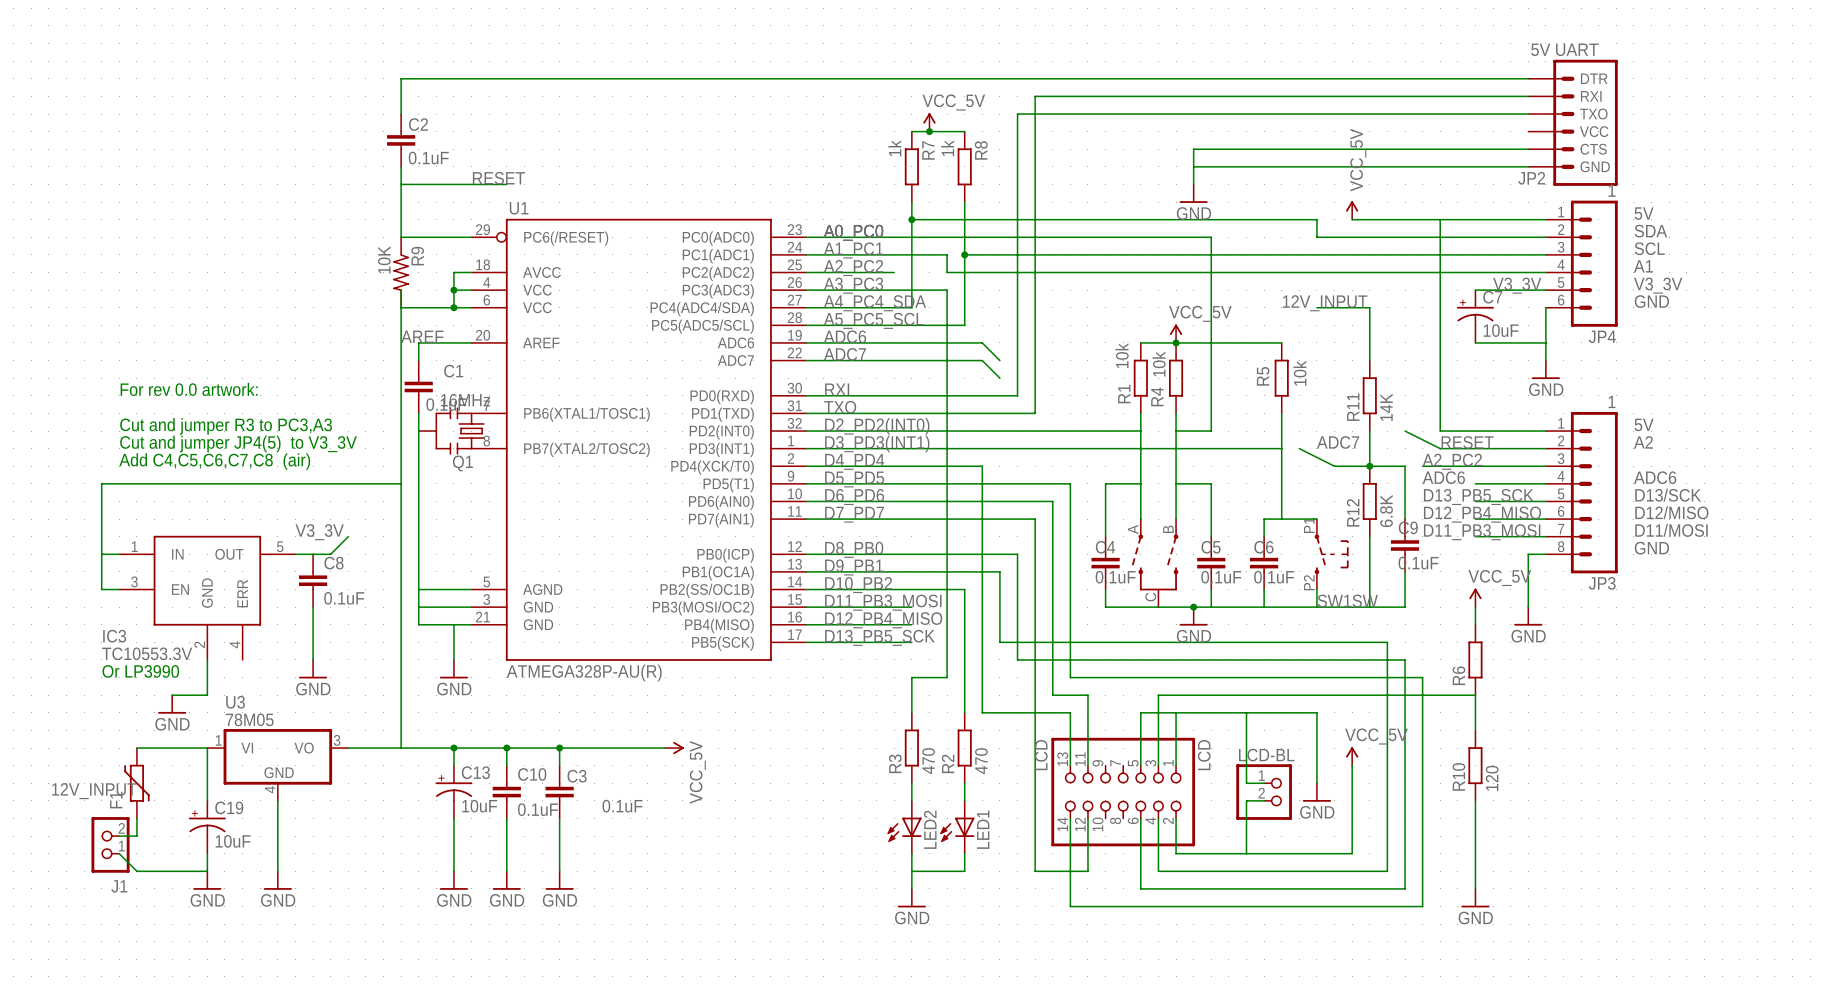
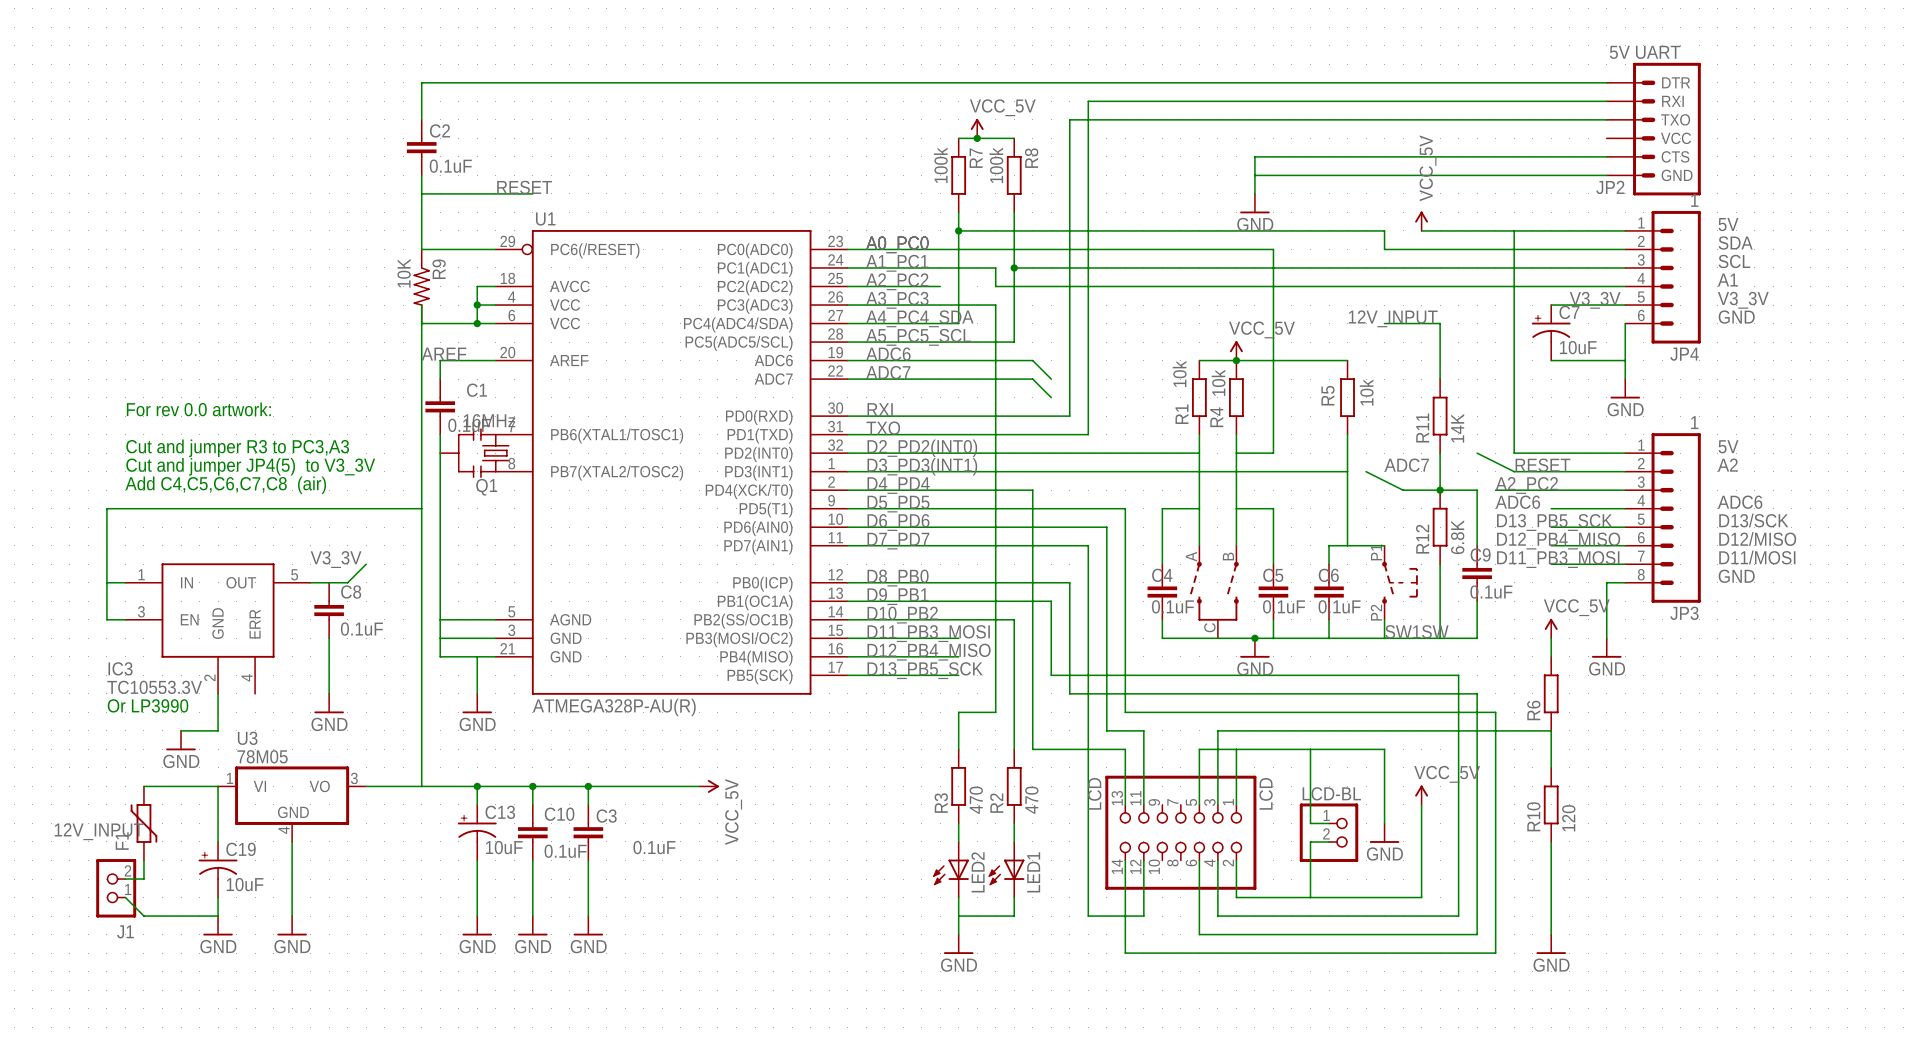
R7 value: 1k (894, 148) -> 100k (940, 165)
R8 value: 1k (947, 148) -> 100k (996, 165)

